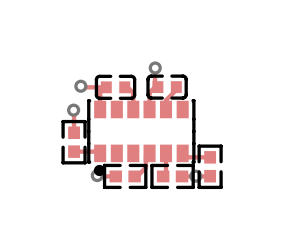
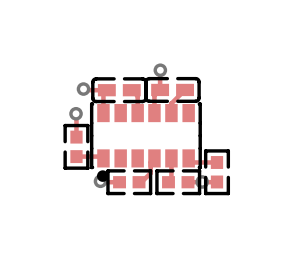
part footprint: [94, 74, 137, 100] -> [91, 77, 148, 104]
part footprint: [146, 74, 188, 100] -> [144, 76, 201, 103]

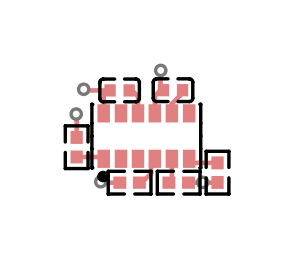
part footprint: [144, 76, 201, 103] -> [151, 77, 195, 104]
part footprint: [91, 77, 148, 104] -> [98, 77, 142, 104]

